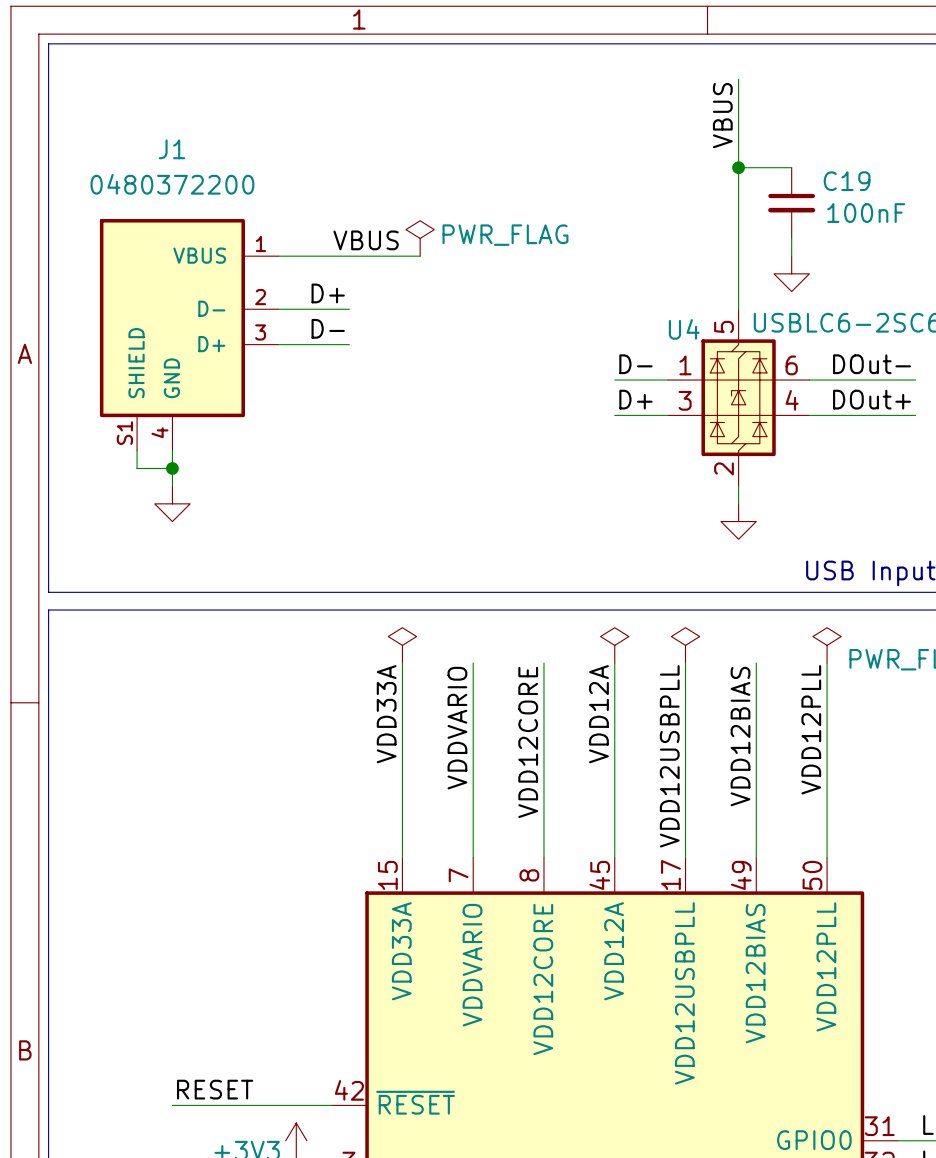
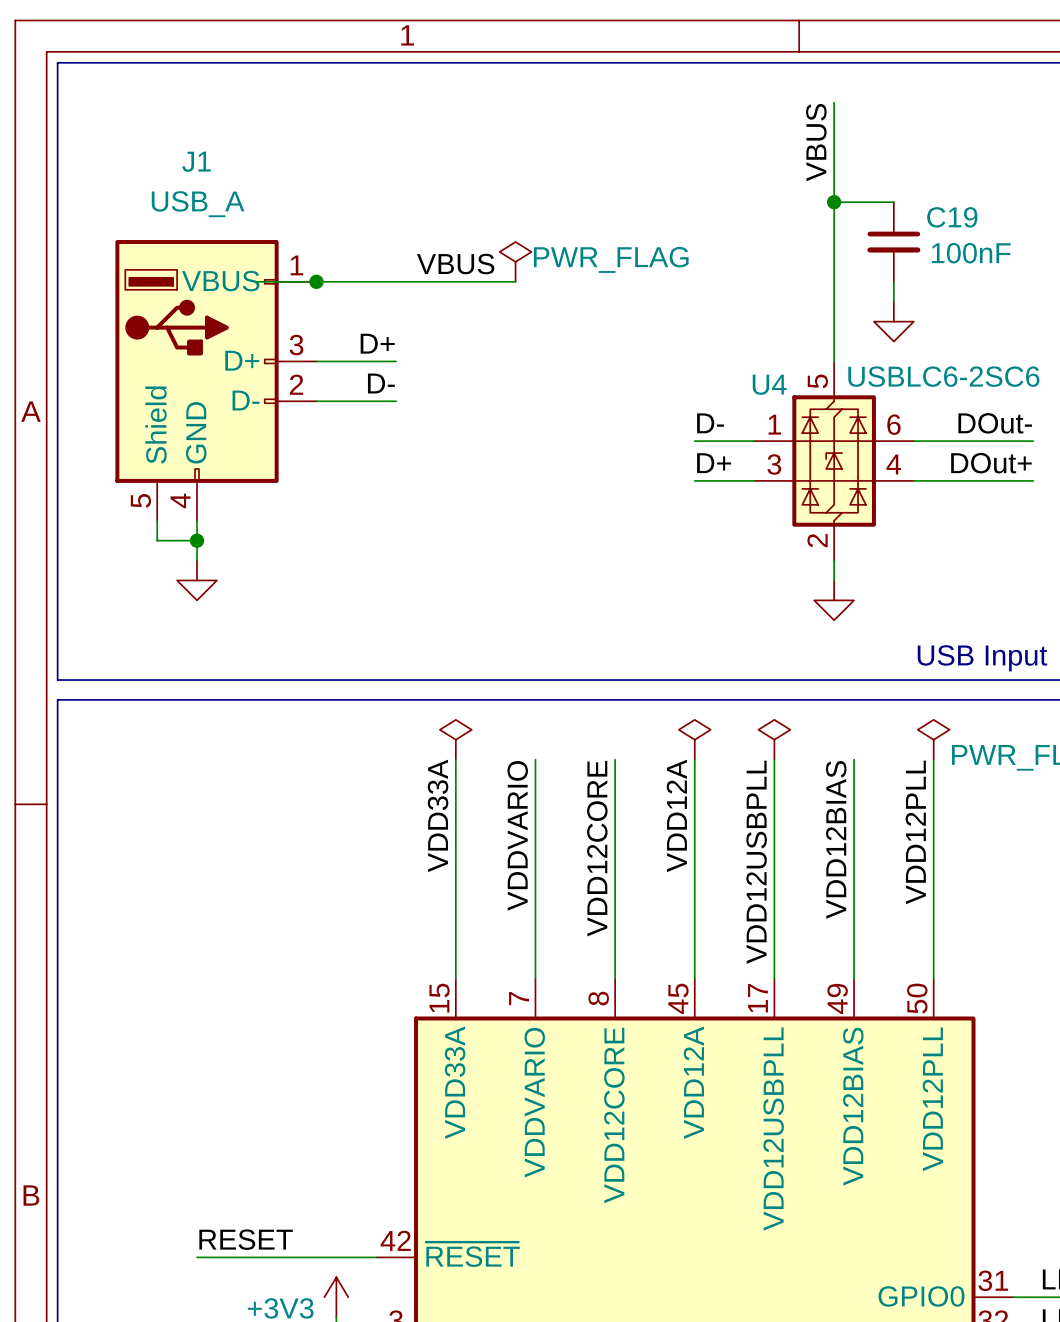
J1 value: 0480372200 (172, 184) -> USB_A (198, 204)
J1 symbol: [99, 219, 279, 451] -> [115, 240, 317, 521]
wire: none -> (256, 281) (515, 281)
junction: none -> (316, 281)
power symbol position: PWR_FLAG (420, 238) -> PWR_FLAG (515, 261)
label position: VBUS (366, 240) -> VBUS (455, 264)
wire: (278, 256) (420, 256) -> none

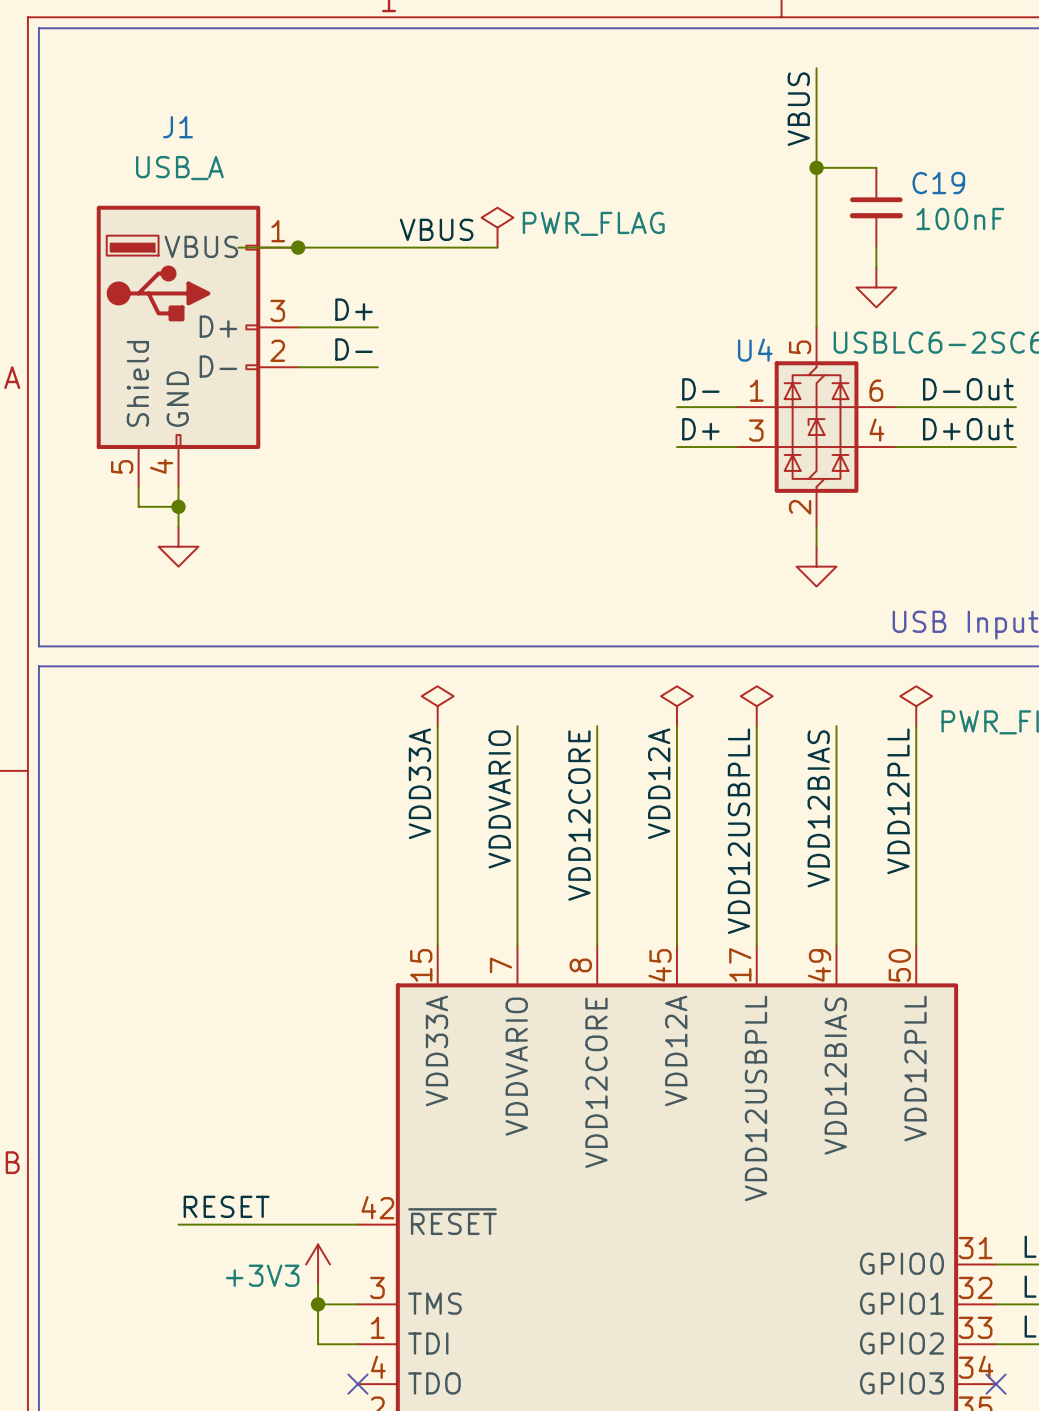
label: DOut- (995, 423) -> D-Out (968, 389)
label: DOut+ (991, 463) -> D+Out (968, 429)

